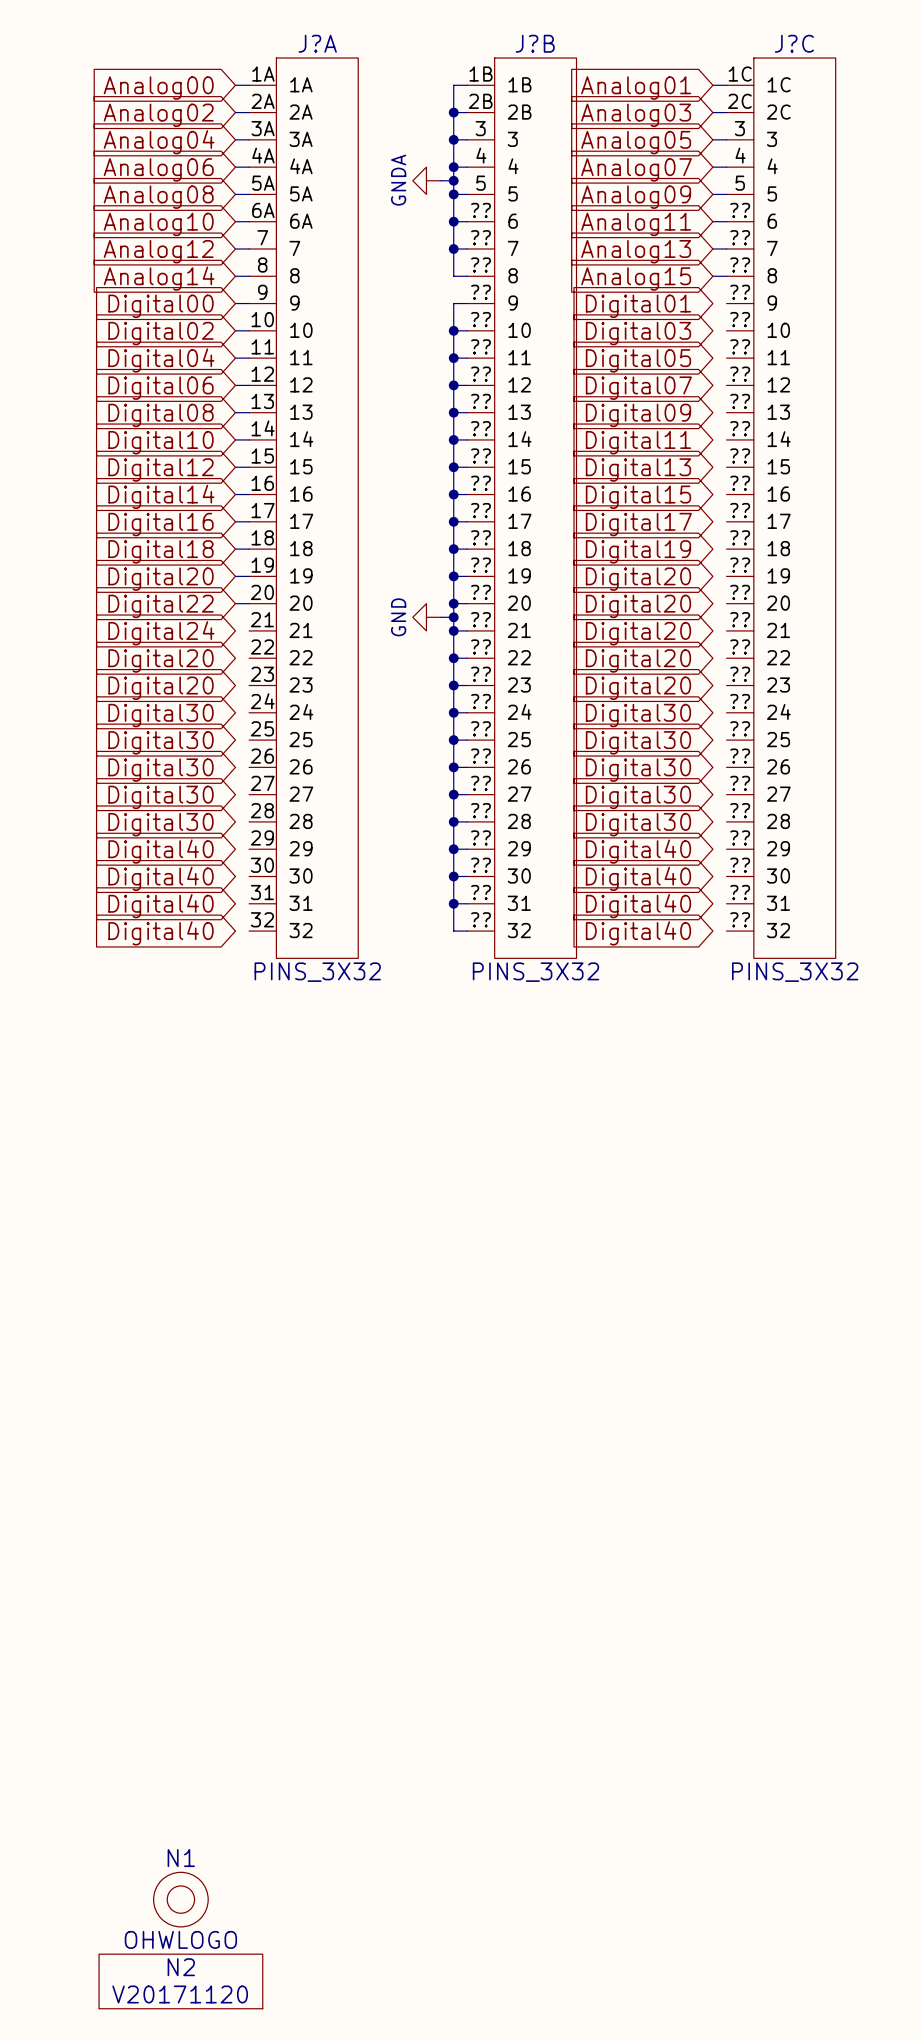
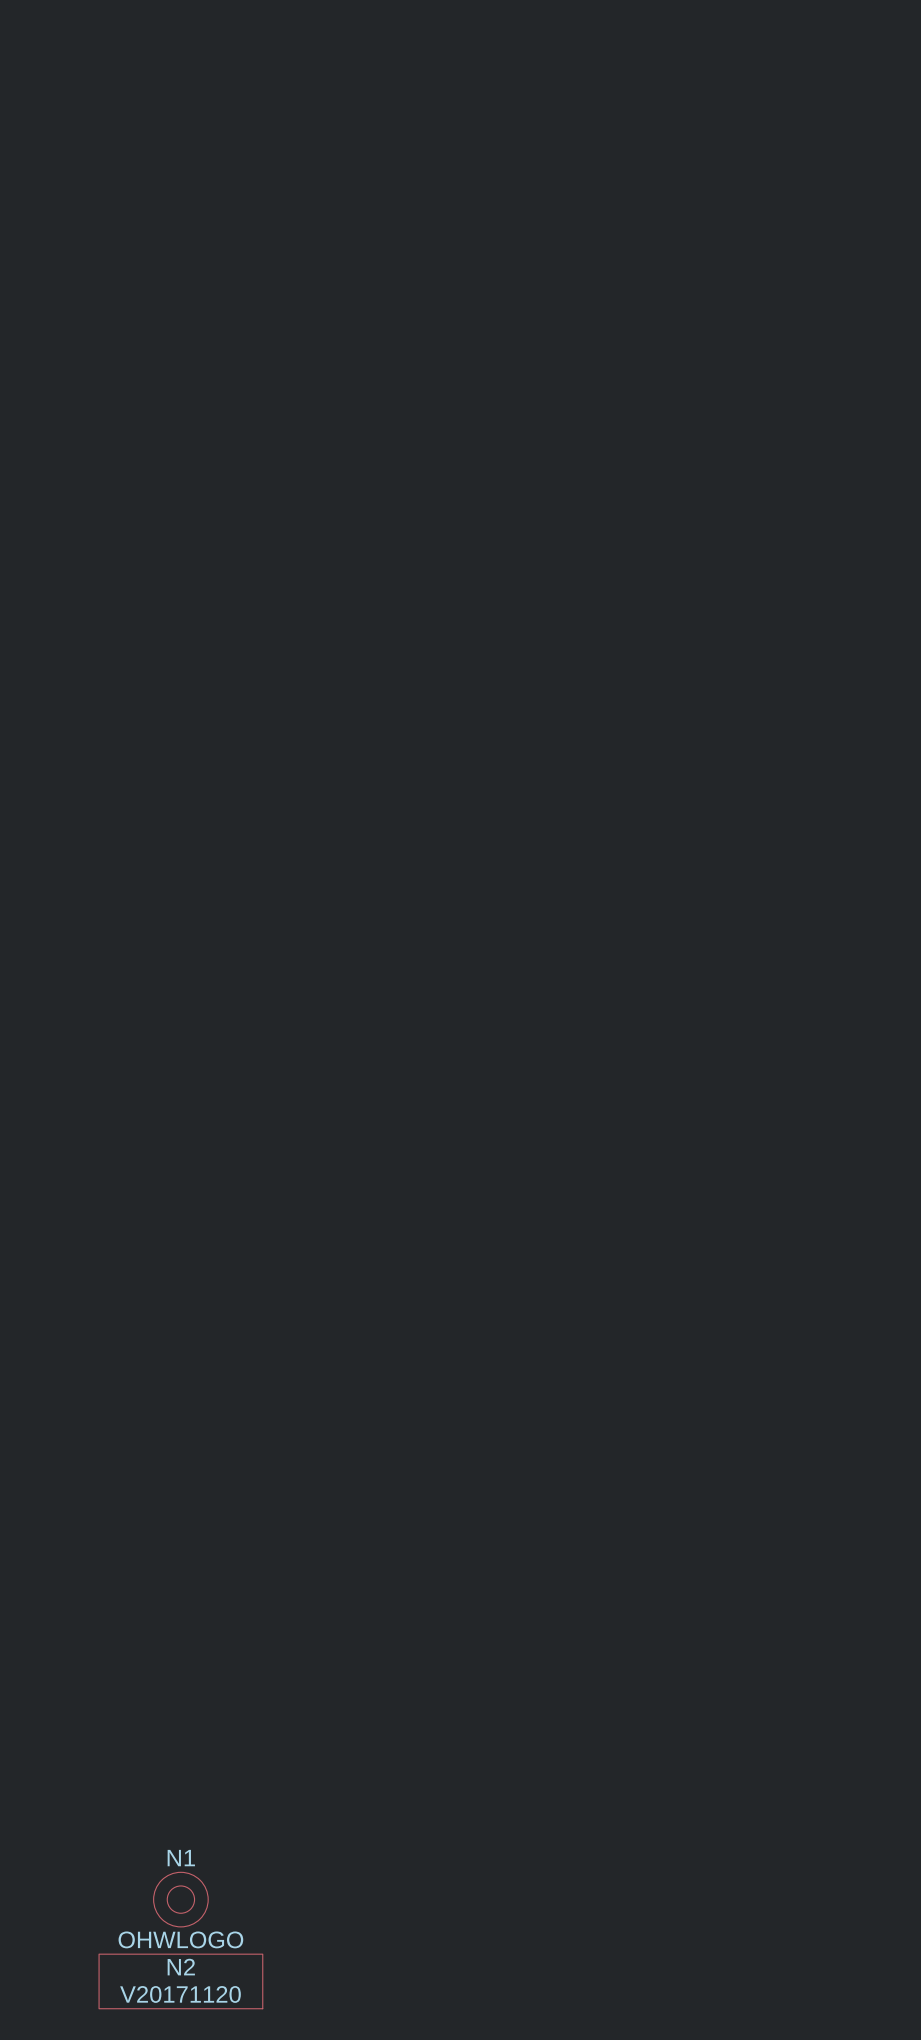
wire: (235, 85) (249, 85) -> none
wire: (467, 85) (453, 85) (453, 276) (467, 276) -> none
wire: (712, 85) (726, 85) -> none
global label: Analog00 (158, 88) -> none
global label: Analog01 (636, 88) -> none
wire: (235, 112) (249, 112) -> none
wire: (453, 112) (467, 112) -> none
junction: (453, 112) -> none
wire: (712, 112) (726, 112) -> none
global label: Analog02 (158, 115) -> none
global label: Analog03 (636, 115) -> none
wire: (235, 139) (249, 139) -> none
wire: (453, 139) (467, 139) -> none
junction: (453, 139) -> none
wire: (712, 139) (726, 139) -> none
global label: Analog04 (159, 142) -> none
global label: Analog05 (636, 142) -> none
wire: (235, 167) (249, 167) -> none
wire: (453, 167) (467, 167) -> none
junction: (453, 167) -> none
wire: (712, 167) (726, 167) -> none
global label: Analog06 (158, 169) -> none
global label: Analog07 (636, 169) -> none
power symbol: GNDA (426, 180) -> none
wire: (440, 180) (453, 180) -> none
junction: (453, 180) -> none
wire: (235, 194) (249, 194) -> none
wire: (453, 194) (467, 194) -> none
junction: (453, 194) -> none
wire: (712, 194) (726, 194) -> none
global label: Analog08 (158, 197) -> none
global label: Analog09 (636, 197) -> none
wire: (235, 221) (249, 221) -> none
wire: (453, 221) (467, 221) -> none
junction: (453, 221) -> none
wire: (712, 221) (726, 221) -> none
global label: Analog10 (158, 224) -> none
global label: Analog11 (636, 224) -> none
wire: (235, 248) (249, 248) -> none
wire: (453, 248) (467, 248) -> none
junction: (453, 248) -> none
wire: (712, 248) (726, 248) -> none
global label: Analog12 (158, 251) -> none
global label: Analog13 (636, 251) -> none
wire: (235, 276) (249, 276) -> none
wire: (712, 276) (726, 276) -> none
global label: Analog14 (159, 278) -> none
global label: Analog15 (636, 279) -> none
wire: (235, 303) (249, 303) -> none
wire: (467, 303) (453, 303) (453, 931) (467, 931) -> none
global label: Digital00 (161, 306) -> none
global label: Digital01 (638, 306) -> none
wire: (235, 330) (249, 330) -> none
wire: (453, 330) (467, 330) -> none
junction: (453, 330) -> none
global label: Digital02 (161, 333) -> none
global label: Digital03 (638, 333) -> none
wire: (235, 358) (249, 358) -> none
wire: (453, 358) (467, 358) -> none
junction: (453, 358) -> none
global label: Digital04 (161, 360) -> none
global label: Digital05 (638, 360) -> none
wire: (235, 385) (249, 385) -> none
wire: (453, 385) (467, 385) -> none
junction: (453, 385) -> none
global label: Digital06 (161, 388) -> none
global label: Digital07 (638, 388) -> none
wire: (235, 412) (249, 412) -> none
wire: (453, 412) (467, 412) -> none
junction: (453, 412) -> none
global label: Digital08 (161, 415) -> none
global label: Digital09 (638, 415) -> none
wire: (235, 439) (249, 439) -> none
wire: (453, 439) (467, 439) -> none
junction: (453, 439) -> none
global label: Digital10 (161, 442) -> none
global label: Digital11 (638, 442) -> none
wire: (235, 467) (249, 467) -> none
wire: (453, 467) (467, 467) -> none
junction: (453, 467) -> none
global label: Digital12 (161, 469) -> none
global label: Digital13 (638, 469) -> none
wire: (235, 494) (249, 494) -> none
wire: (453, 494) (467, 494) -> none
junction: (453, 494) -> none
global label: Digital14 (161, 496) -> none
global label: Digital15 (638, 497) -> none
J?A: PINS_3X32 (303, 508) -> none
J?B: PINS_3X32 (521, 508) -> none
J?C: PINS_3X32 (781, 508) -> none
wire: (235, 521) (249, 521) -> none
wire: (453, 521) (467, 521) -> none
junction: (453, 521) -> none
global label: Digital16 (161, 524) -> none
global label: Digital17 (638, 524) -> none
wire: (235, 549) (249, 549) -> none
wire: (453, 549) (467, 549) -> none
junction: (453, 549) -> none
global label: Digital18 (161, 551) -> none
global label: Digital19 (638, 551) -> none
wire: (235, 576) (249, 576) -> none
wire: (453, 576) (467, 576) -> none
junction: (453, 576) -> none
global label: Digital20 (161, 579) -> none
global label: Digital20 (638, 579) -> none
wire: (235, 603) (249, 603) -> none
wire: (453, 603) (467, 603) -> none
junction: (453, 603) -> none
global label: Digital22 (161, 606) -> none
global label: Digital20 (638, 606) -> none
power symbol: GND (426, 617) -> none
wire: (440, 617) (453, 617) -> none
junction: (453, 617) -> none
wire: (453, 630) (467, 630) -> none
junction: (453, 630) -> none
global label: Digital24 (161, 633) -> none
global label: Digital20 (638, 633) -> none
wire: (453, 658) (467, 658) -> none
junction: (453, 658) -> none
global label: Digital20 (161, 660) -> none
global label: Digital20 (638, 660) -> none
wire: (453, 685) (467, 685) -> none
junction: (453, 685) -> none
global label: Digital20 (161, 688) -> none
global label: Digital20 (638, 688) -> none
wire: (453, 712) (467, 712) -> none
junction: (453, 712) -> none
global label: Digital30 (161, 715) -> none
global label: Digital30 (638, 715) -> none
wire: (453, 740) (467, 740) -> none
junction: (453, 740) -> none
global label: Digital30 (161, 742) -> none
global label: Digital30 (638, 742) -> none
wire: (453, 767) (467, 767) -> none
junction: (453, 767) -> none
global label: Digital30 (161, 770) -> none
global label: Digital30 (638, 770) -> none
wire: (453, 794) (467, 794) -> none
junction: (453, 794) -> none
global label: Digital30 (161, 797) -> none
global label: Digital30 (638, 797) -> none
wire: (453, 821) (467, 821) -> none
junction: (453, 821) -> none
global label: Digital30 (161, 824) -> none
global label: Digital30 (638, 824) -> none
wire: (453, 849) (467, 849) -> none
junction: (453, 849) -> none
global label: Digital40 (161, 851) -> none
global label: Digital40 (638, 851) -> none
wire: (453, 876) (467, 876) -> none
junction: (453, 876) -> none
global label: Digital40 (161, 878) -> none
global label: Digital40 (638, 878) -> none
wire: (453, 903) (467, 903) -> none
junction: (453, 903) -> none
global label: Digital40 (161, 906) -> none
global label: Digital40 (638, 906) -> none
global label: Digital40 (161, 933) -> none
global label: Digital40 (638, 933) -> none

